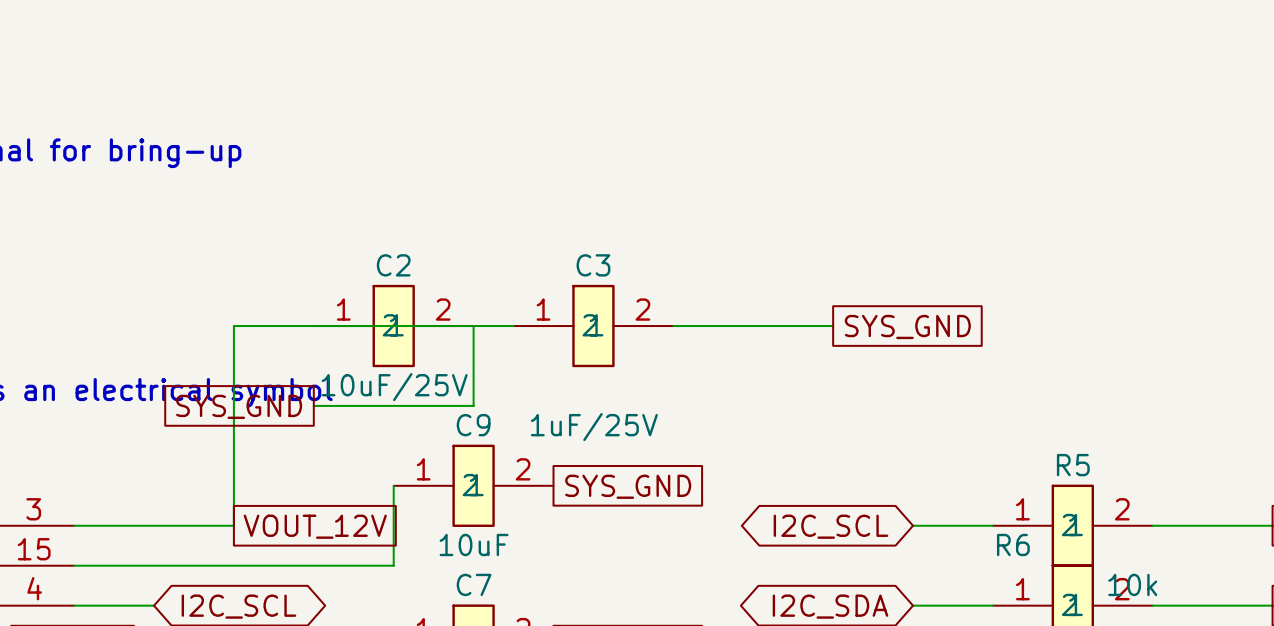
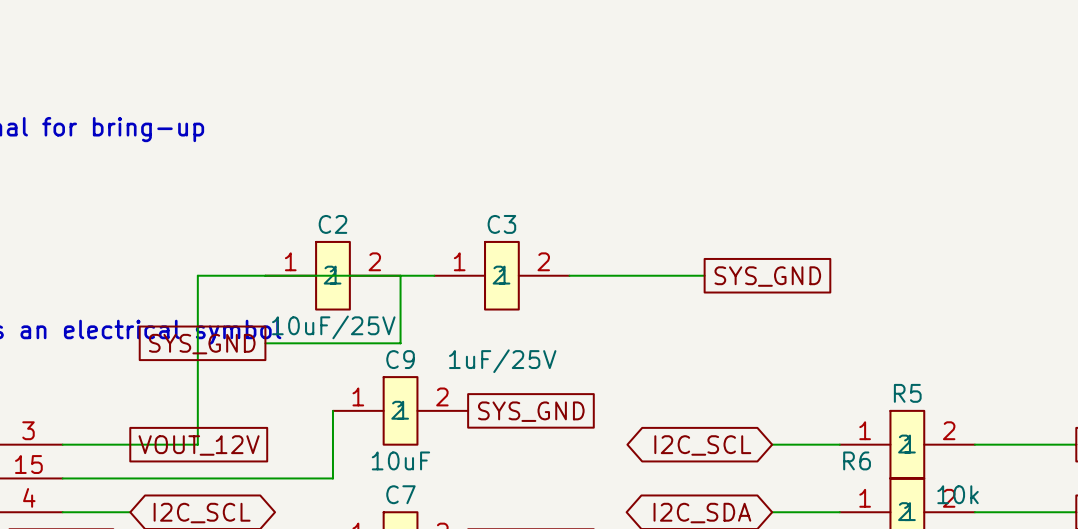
global label position: VOUT_12V (315, 526) -> VOUT_12V (199, 445)

